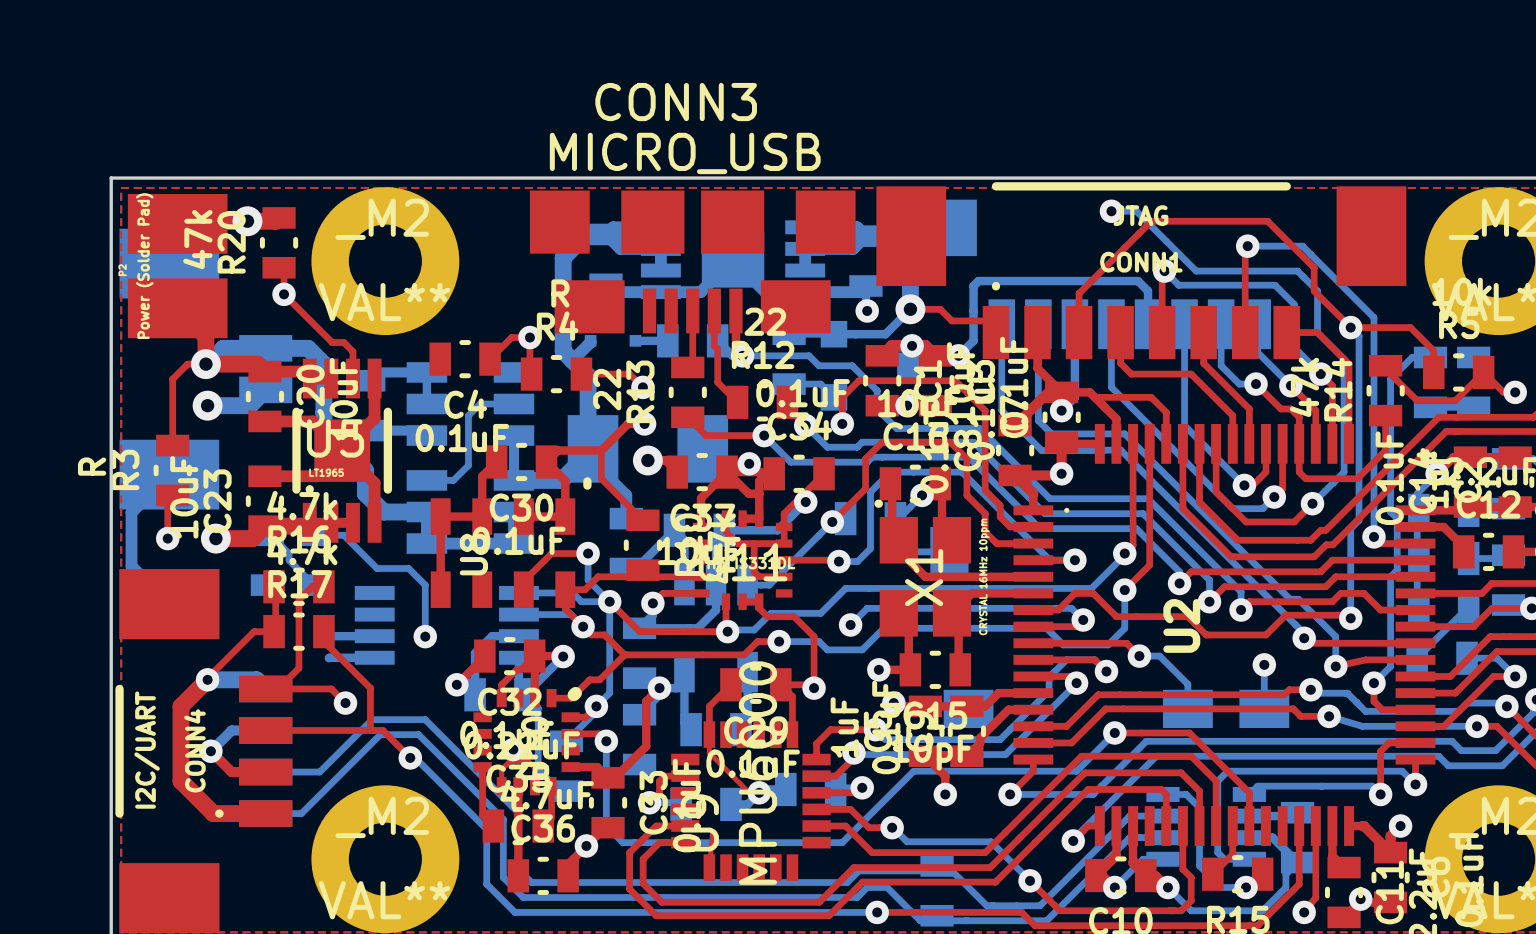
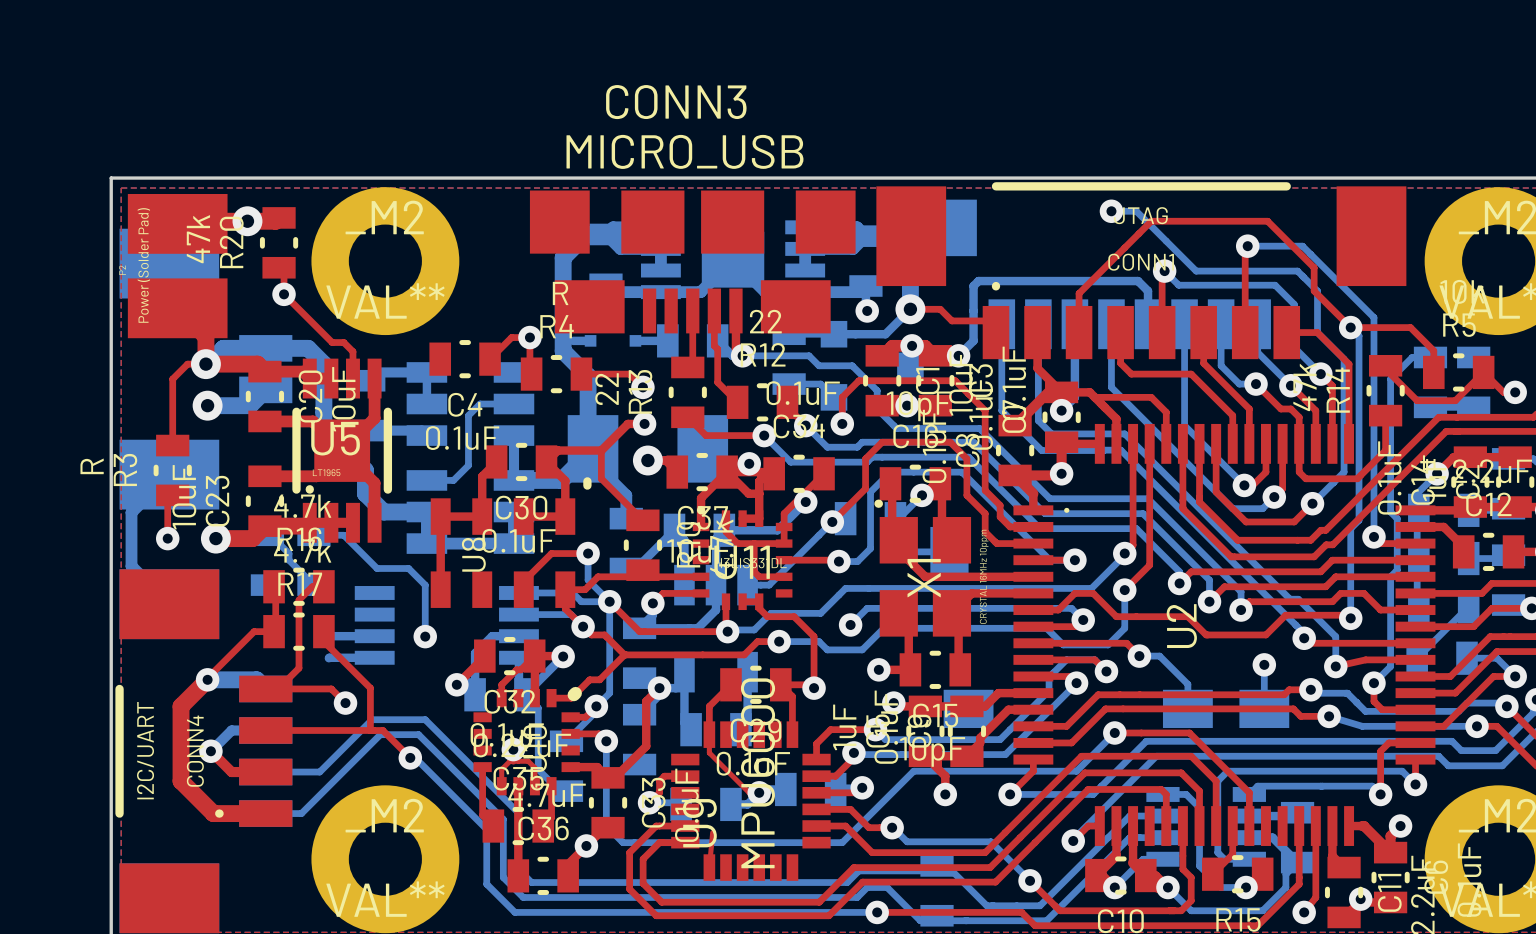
bottom track: none -> (573, 340) (588, 340)
bottom track: (590, 340) (572, 360) -> none

